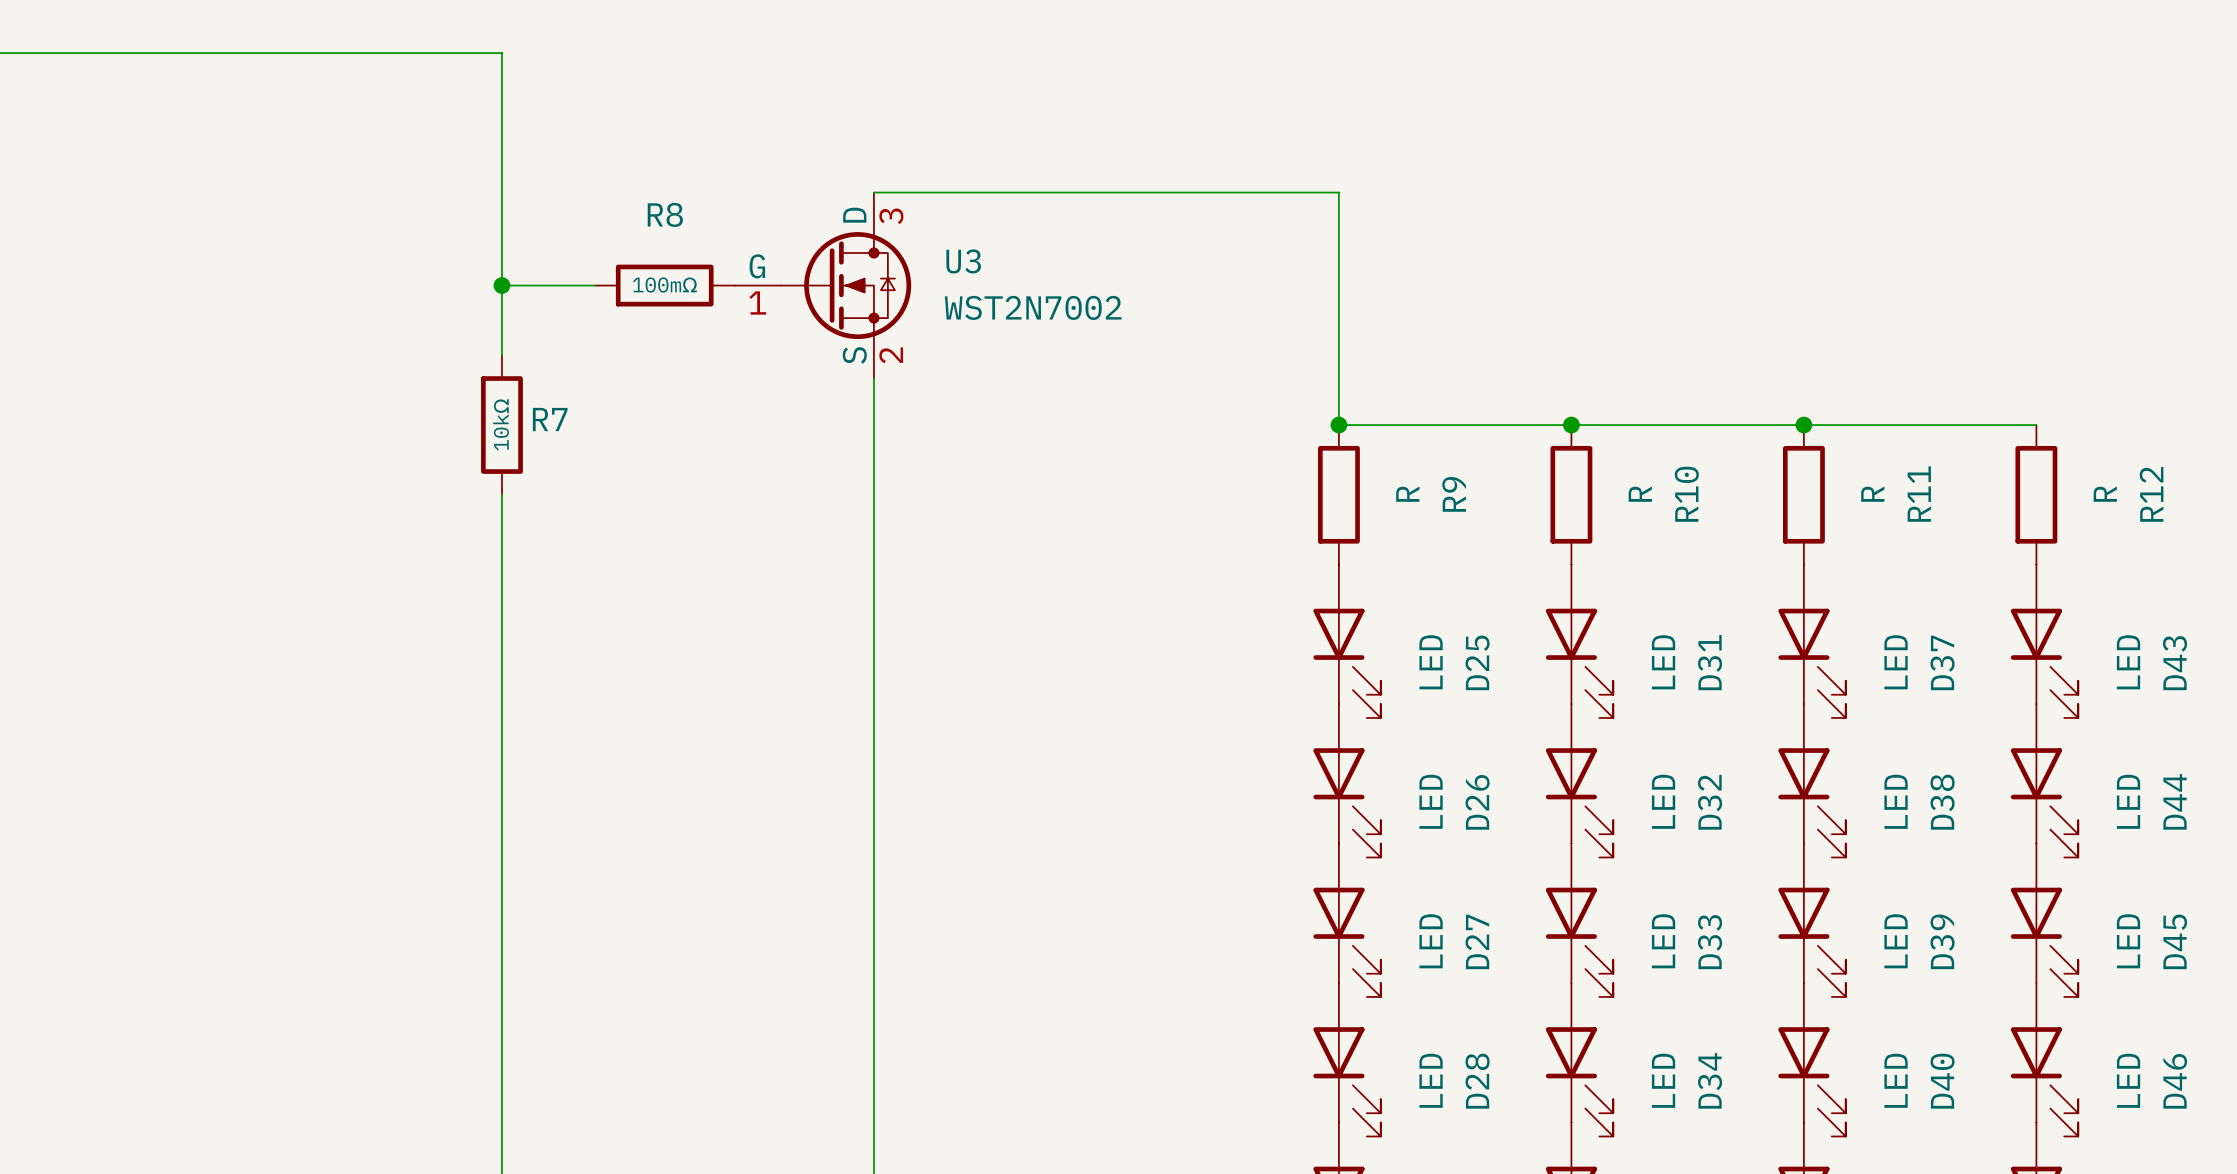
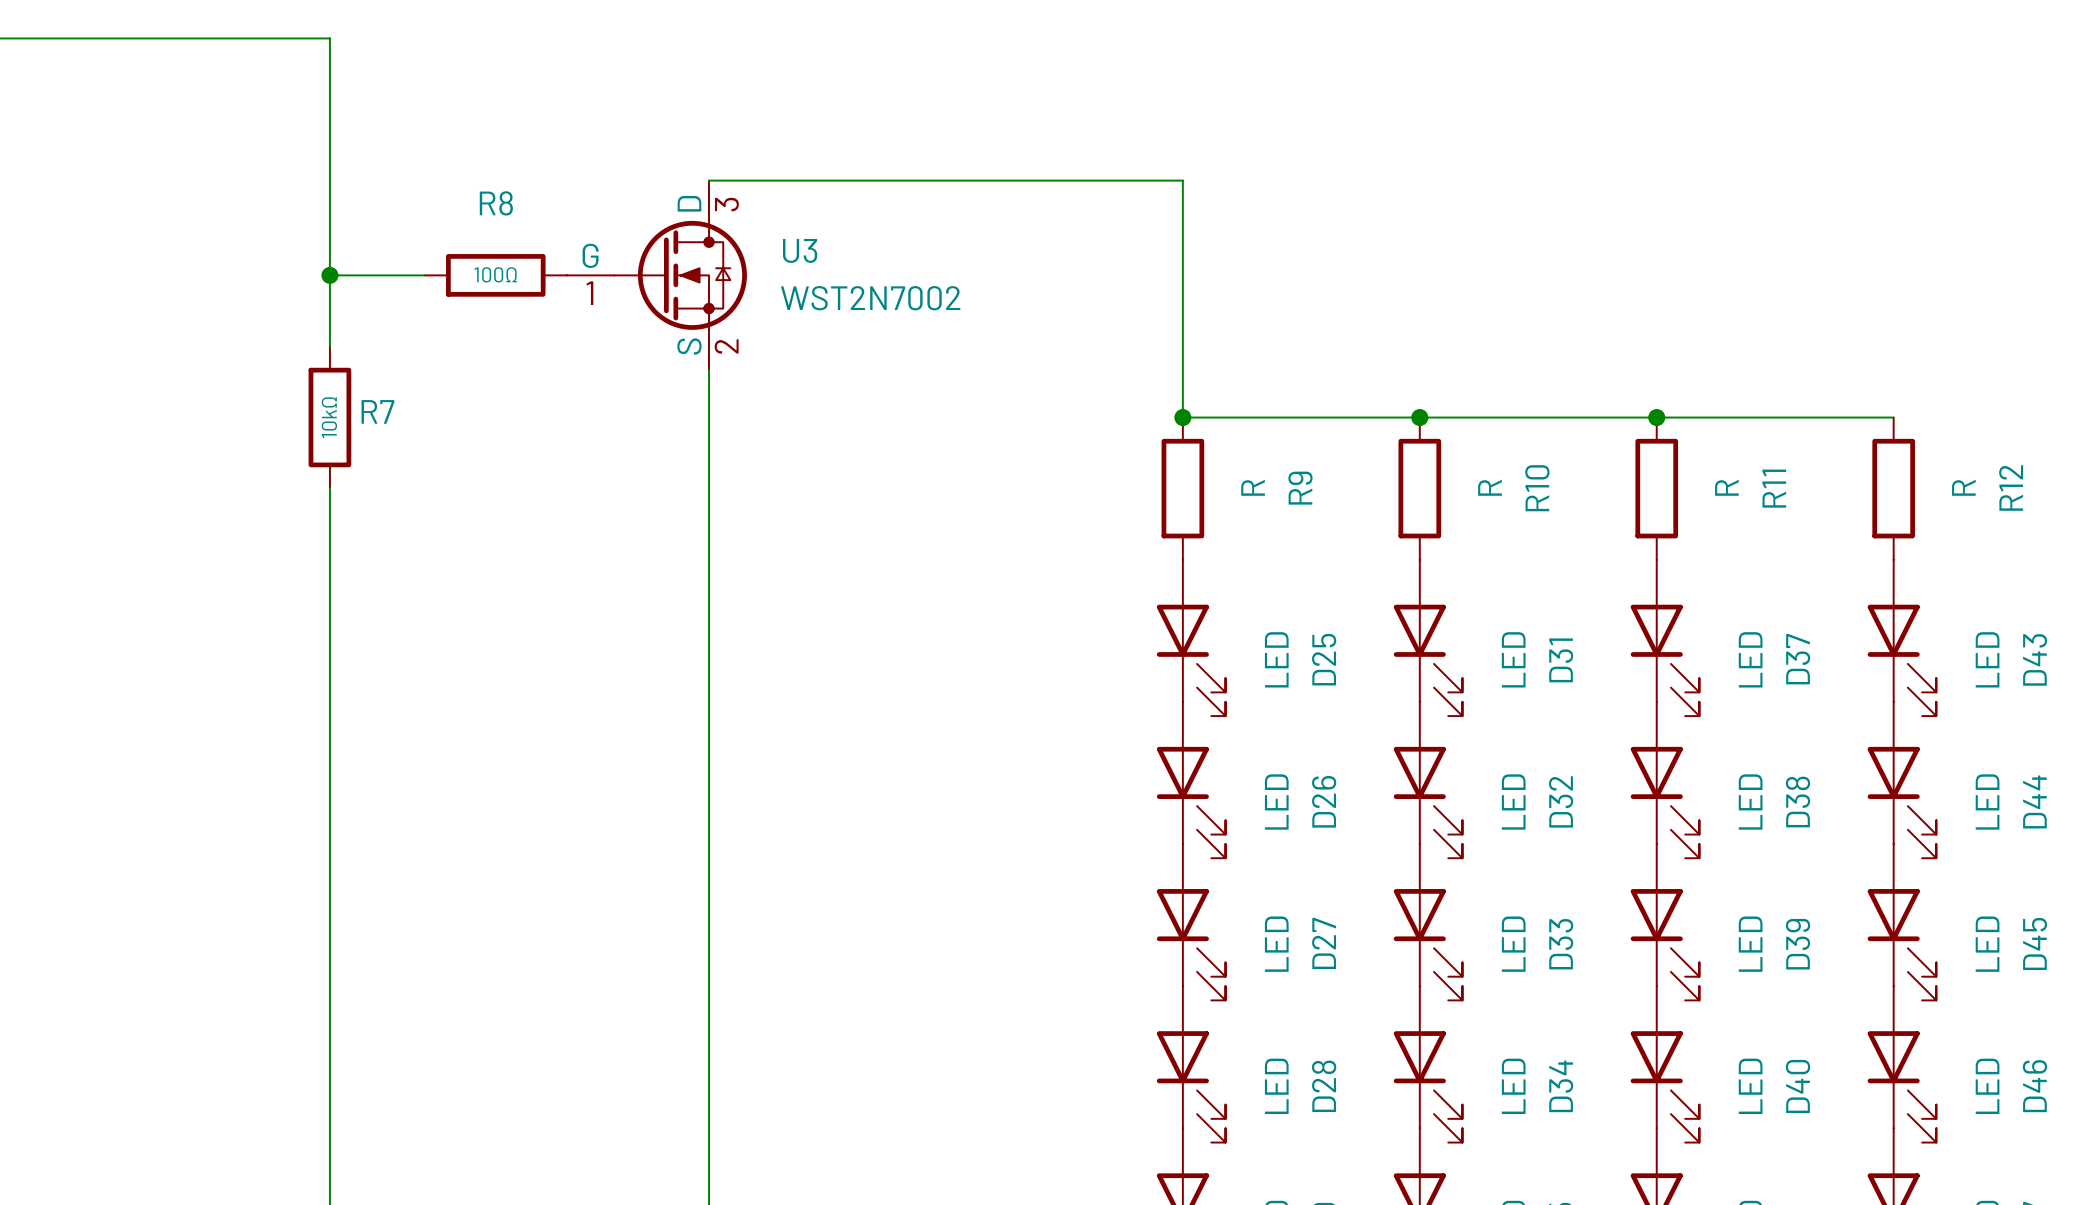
R8 value: 100mΩ (664, 285) -> 100Ω (495, 274)

